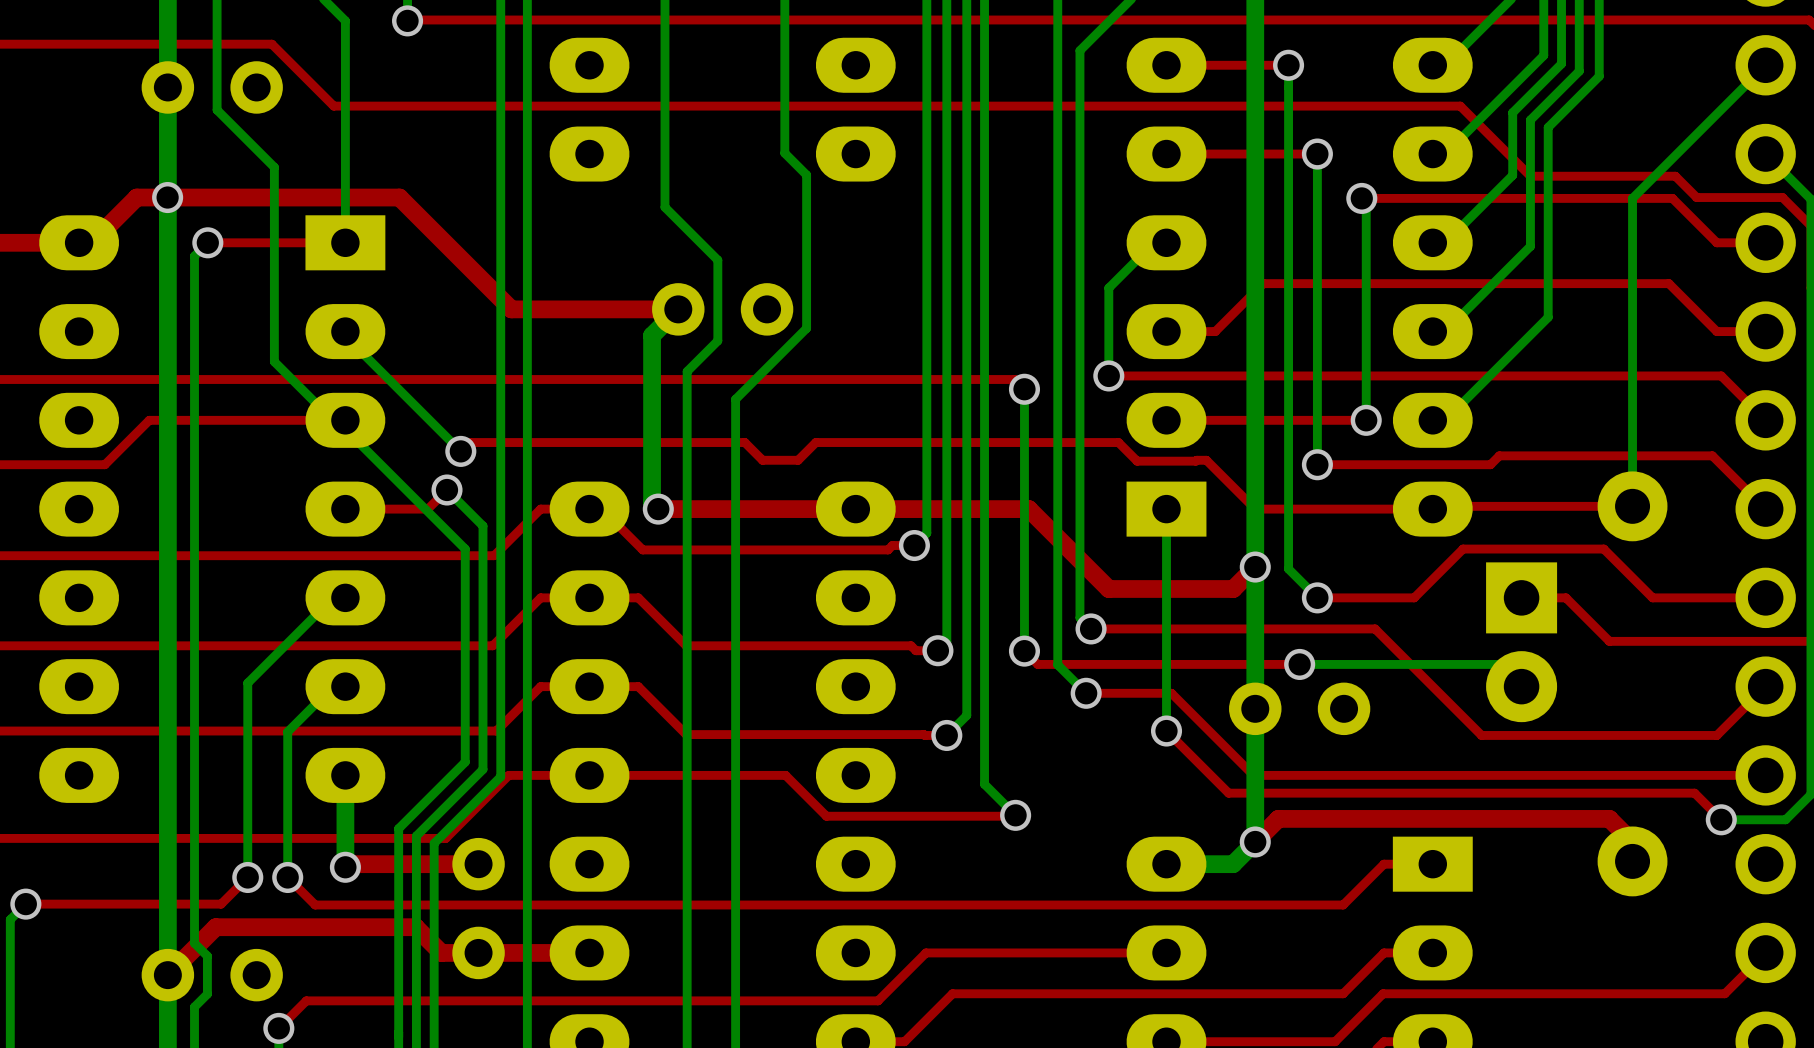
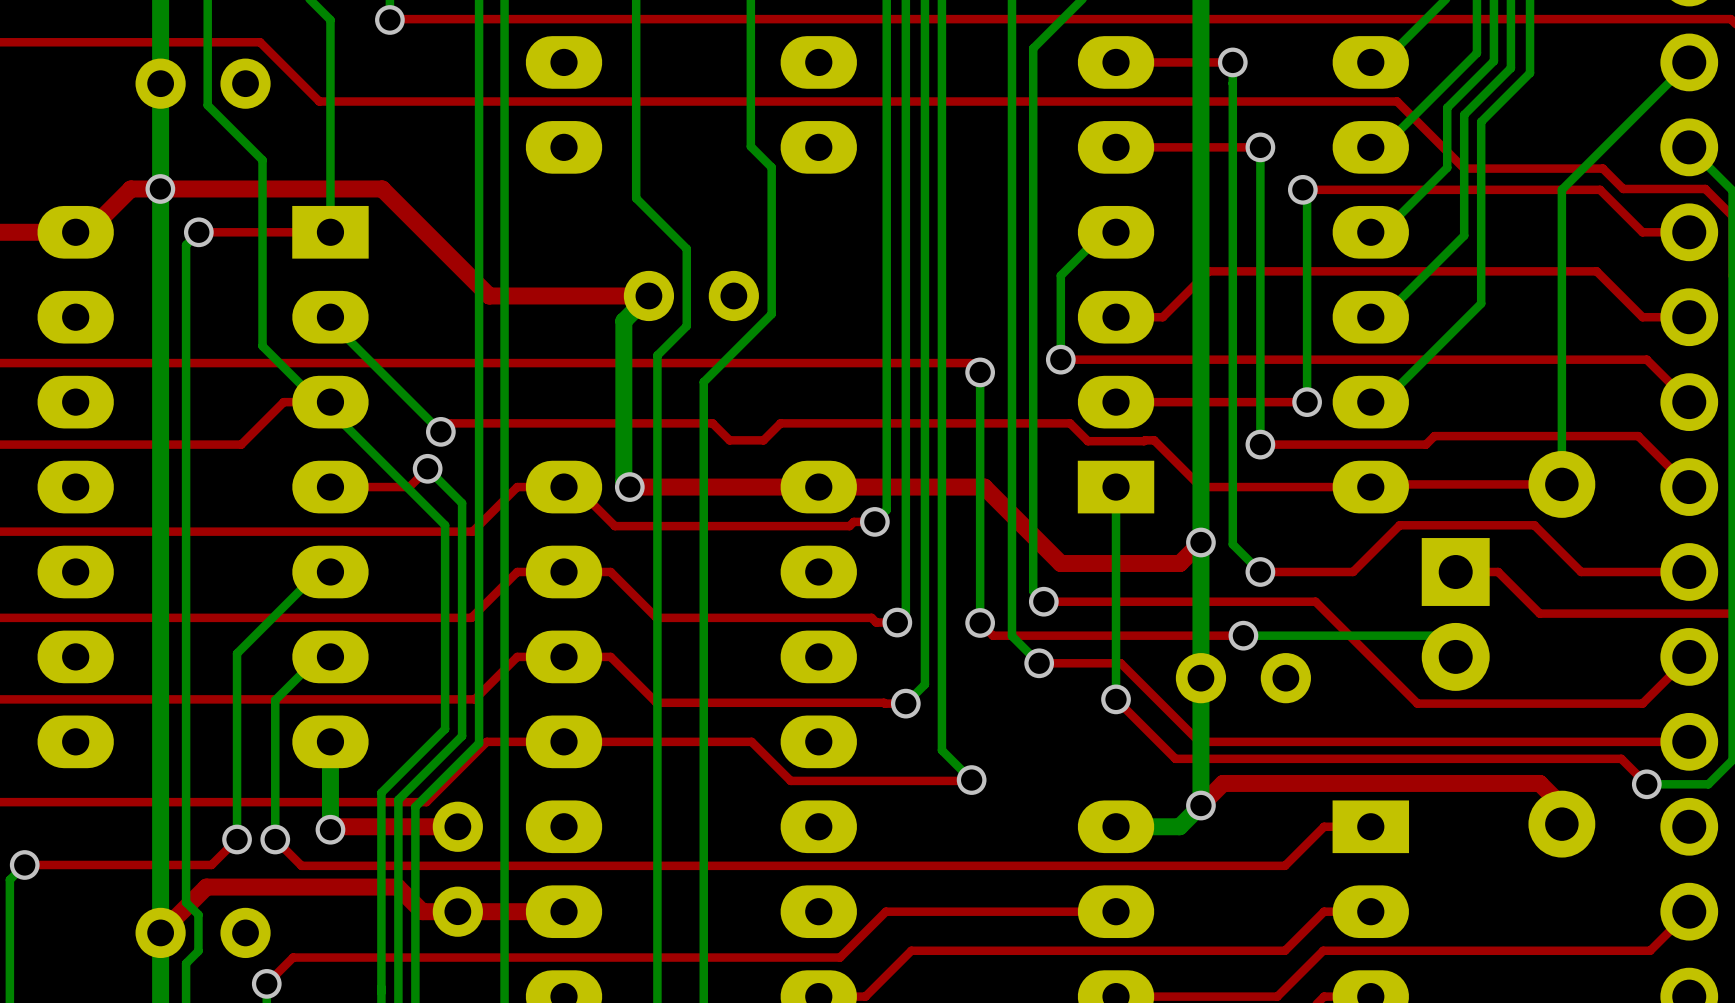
top track: (296, 420) (149, 420) (104, 464) -> (283, 402) (241, 444) (100, 444)

